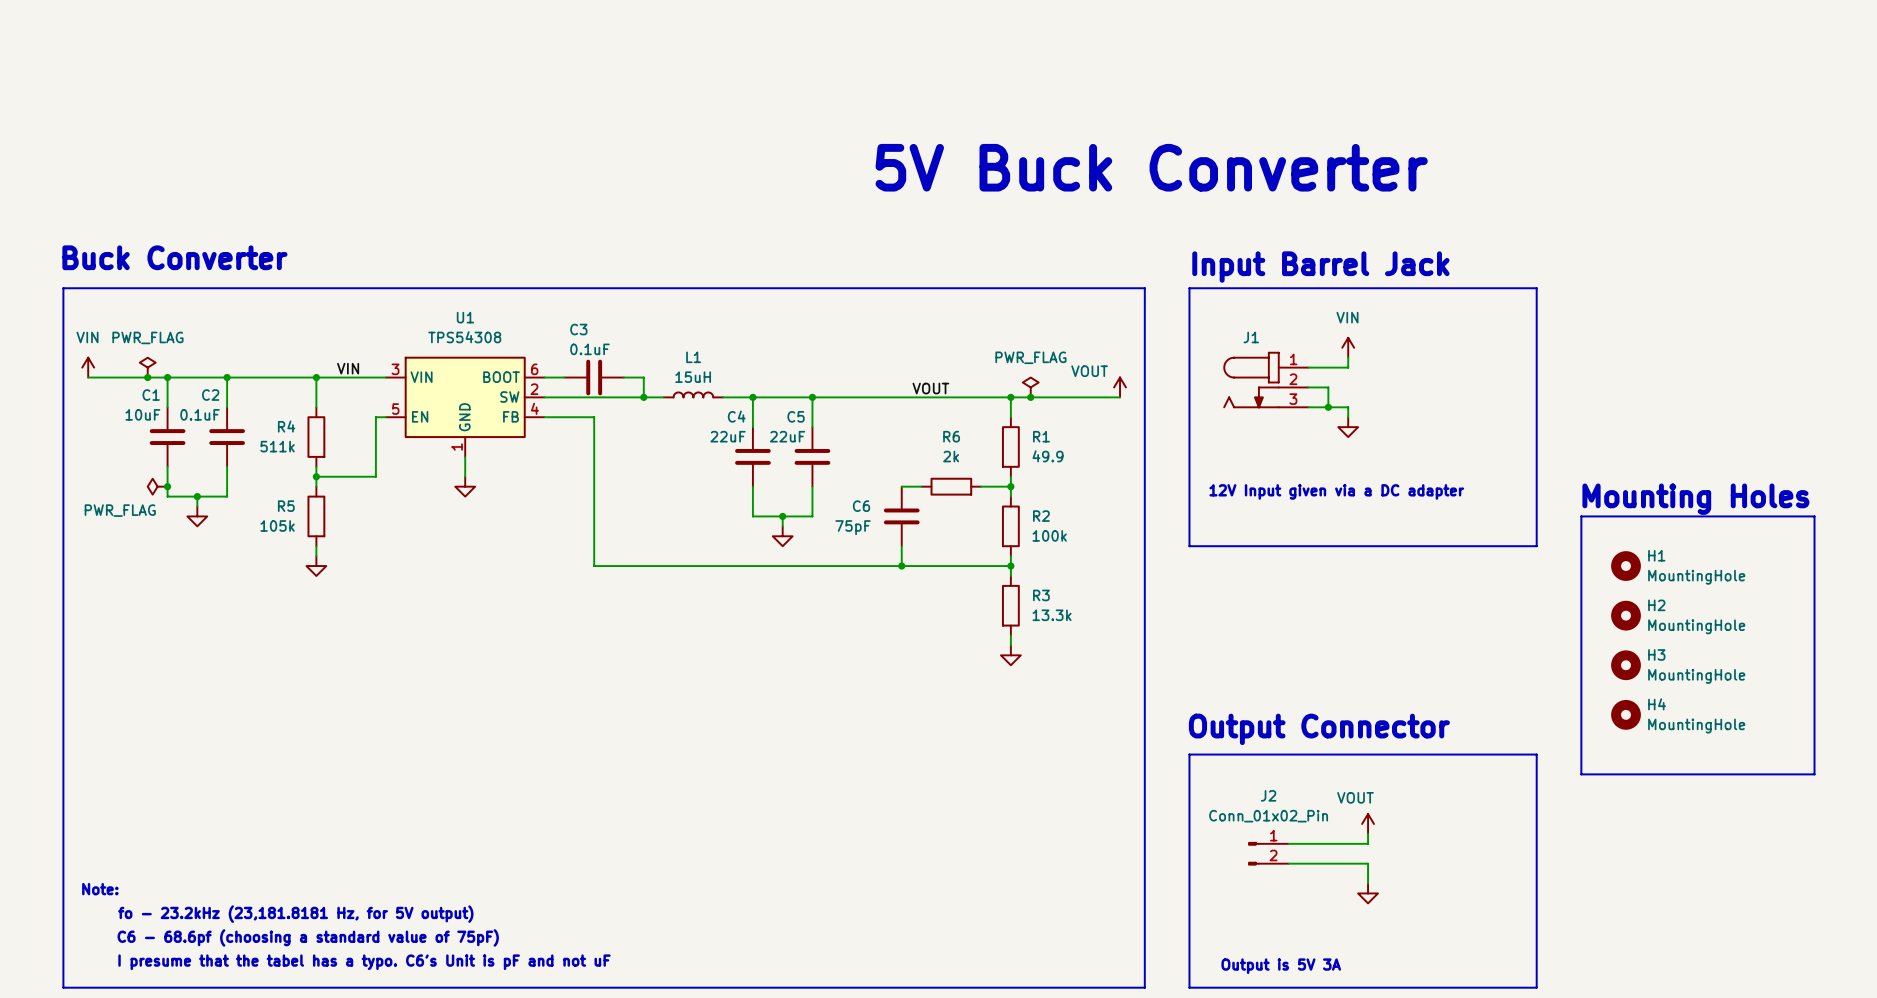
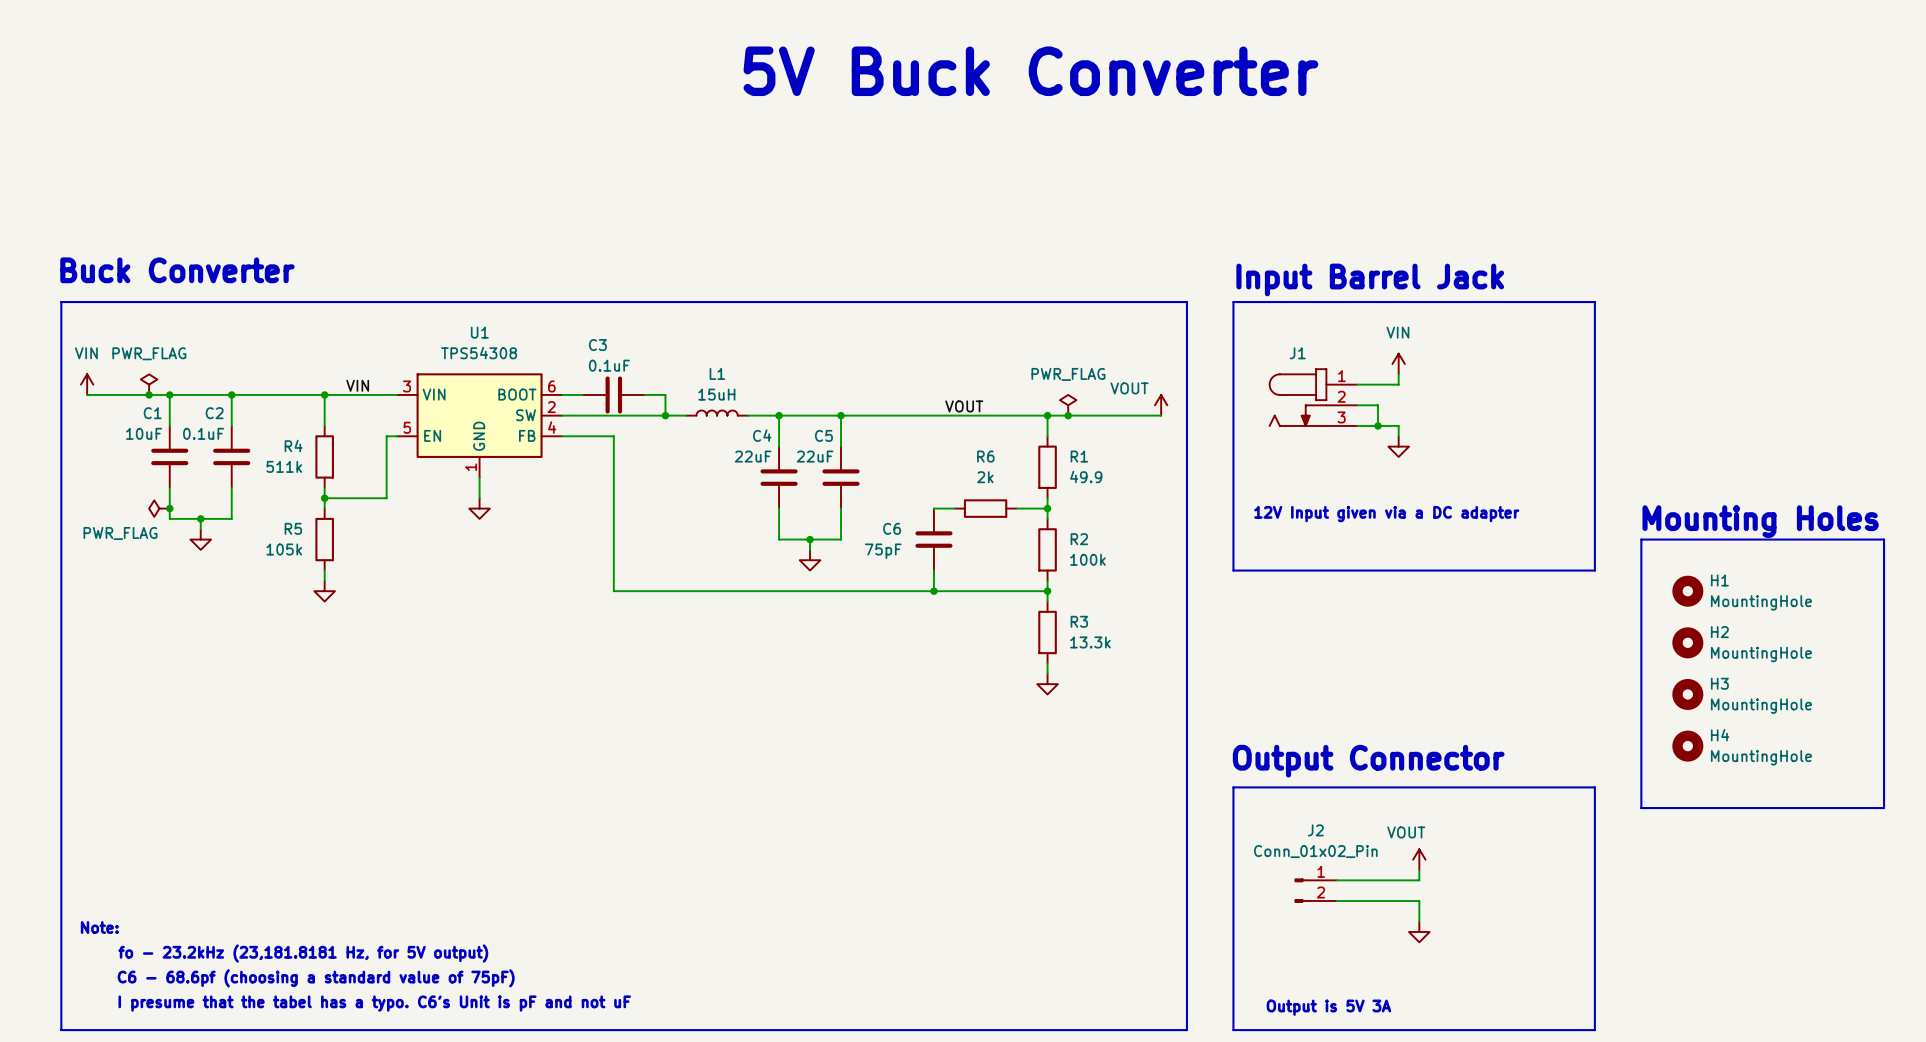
text position: 5V Buck Converter (1151, 167) -> 5V Buck Converter (1030, 71)

